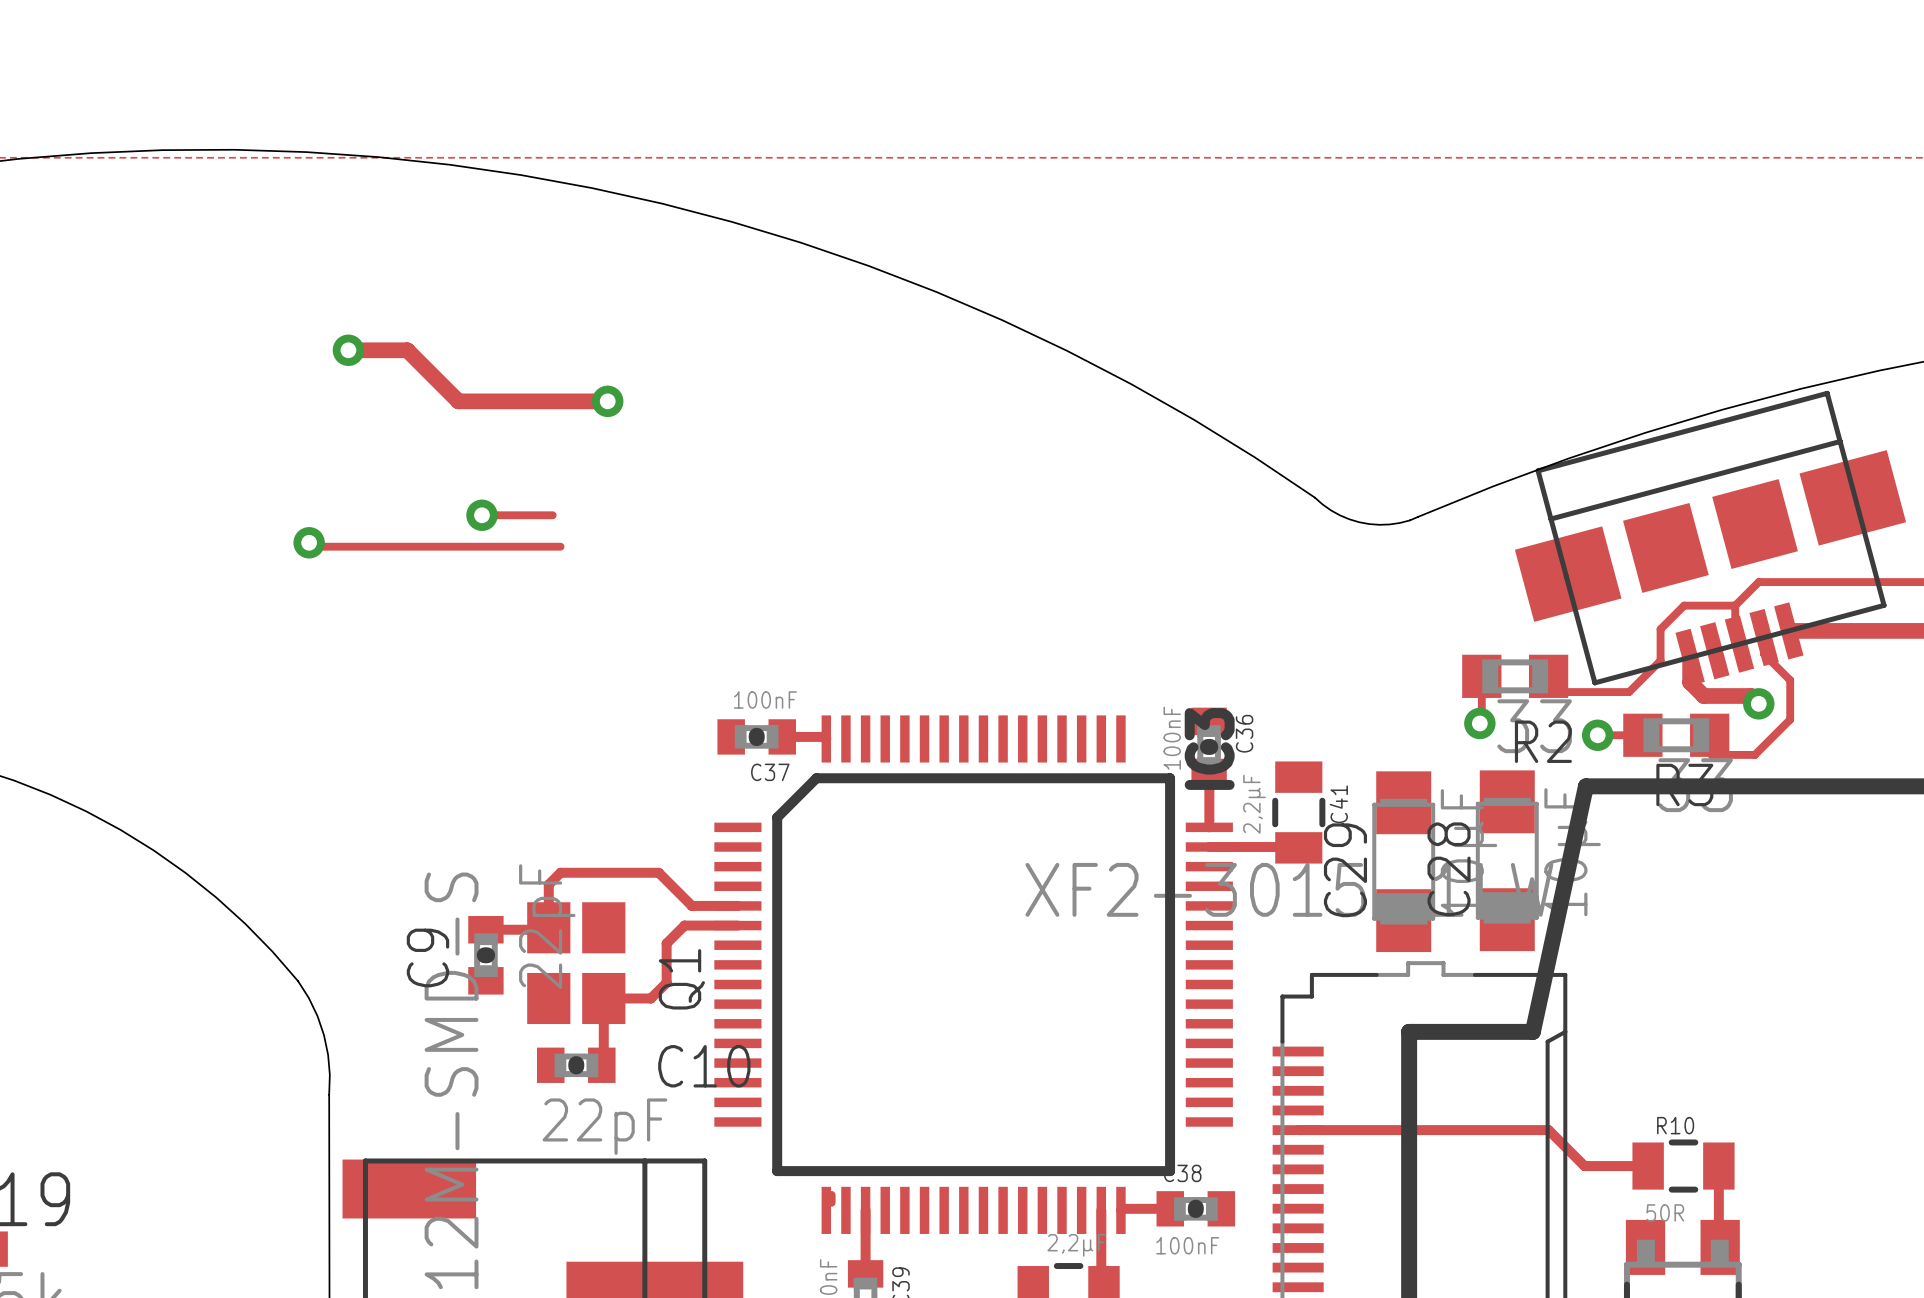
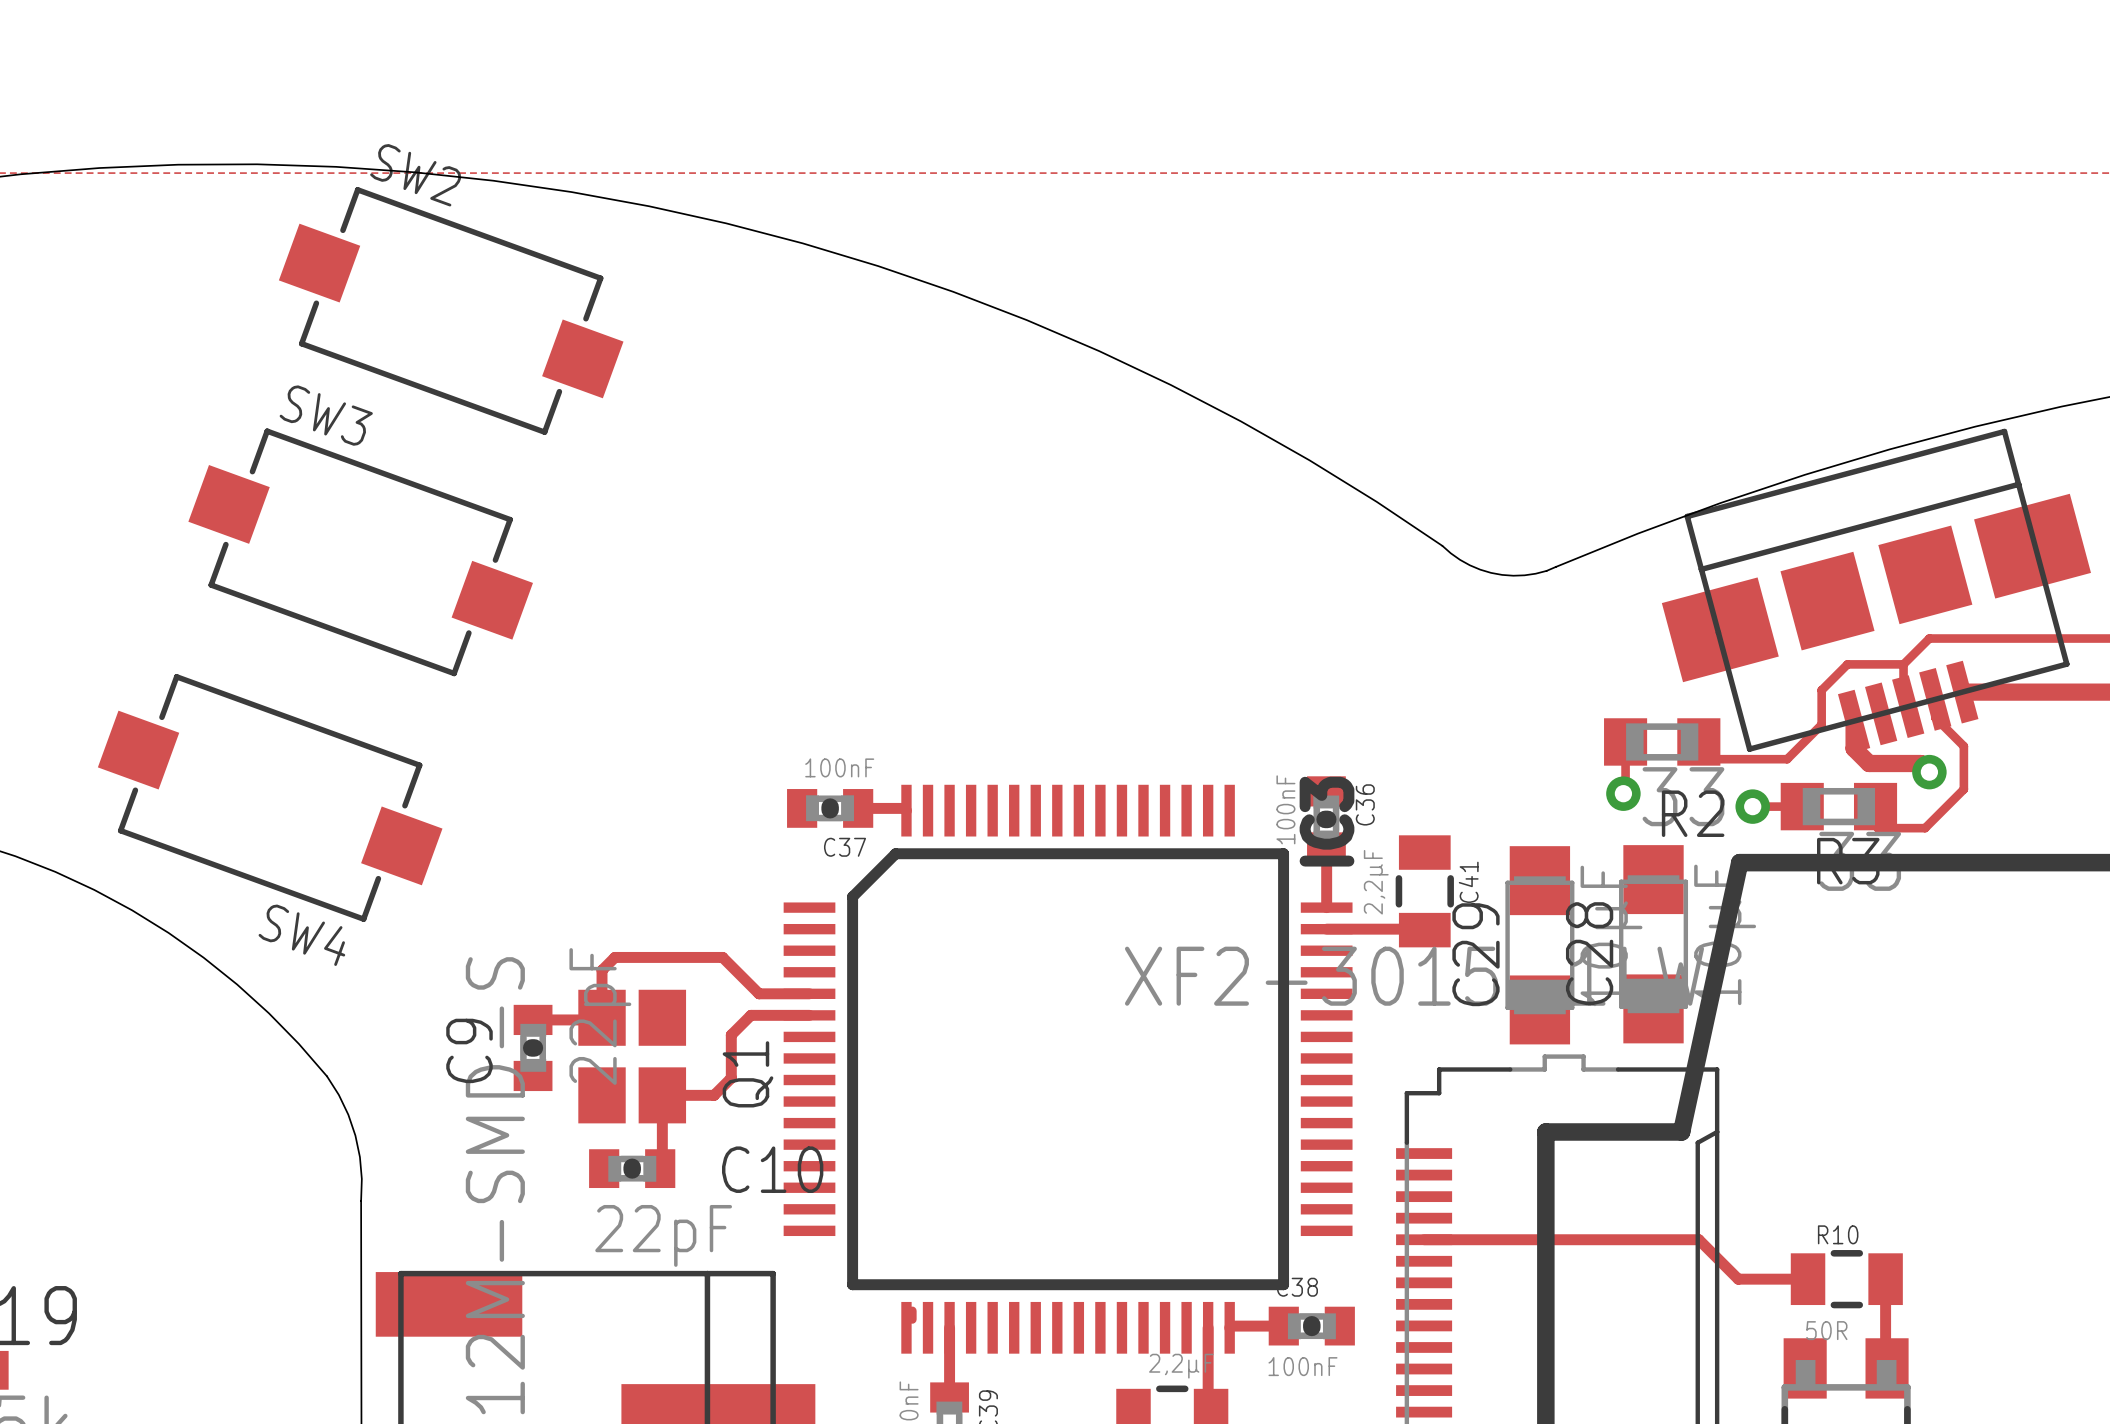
SW2: none -> (451, 310)
track: (348, 350) (407, 350) (458, 401) (607, 401) -> none
via: (348, 350) -> none
via: (607, 401) -> none
SW3: none -> (360, 552)
track: (481, 515) (552, 515) -> none
via: (481, 515) -> none
track: (304, 538) (313, 546) (560, 546) -> none
via: (309, 542) -> none
SW4: none -> (270, 797)

